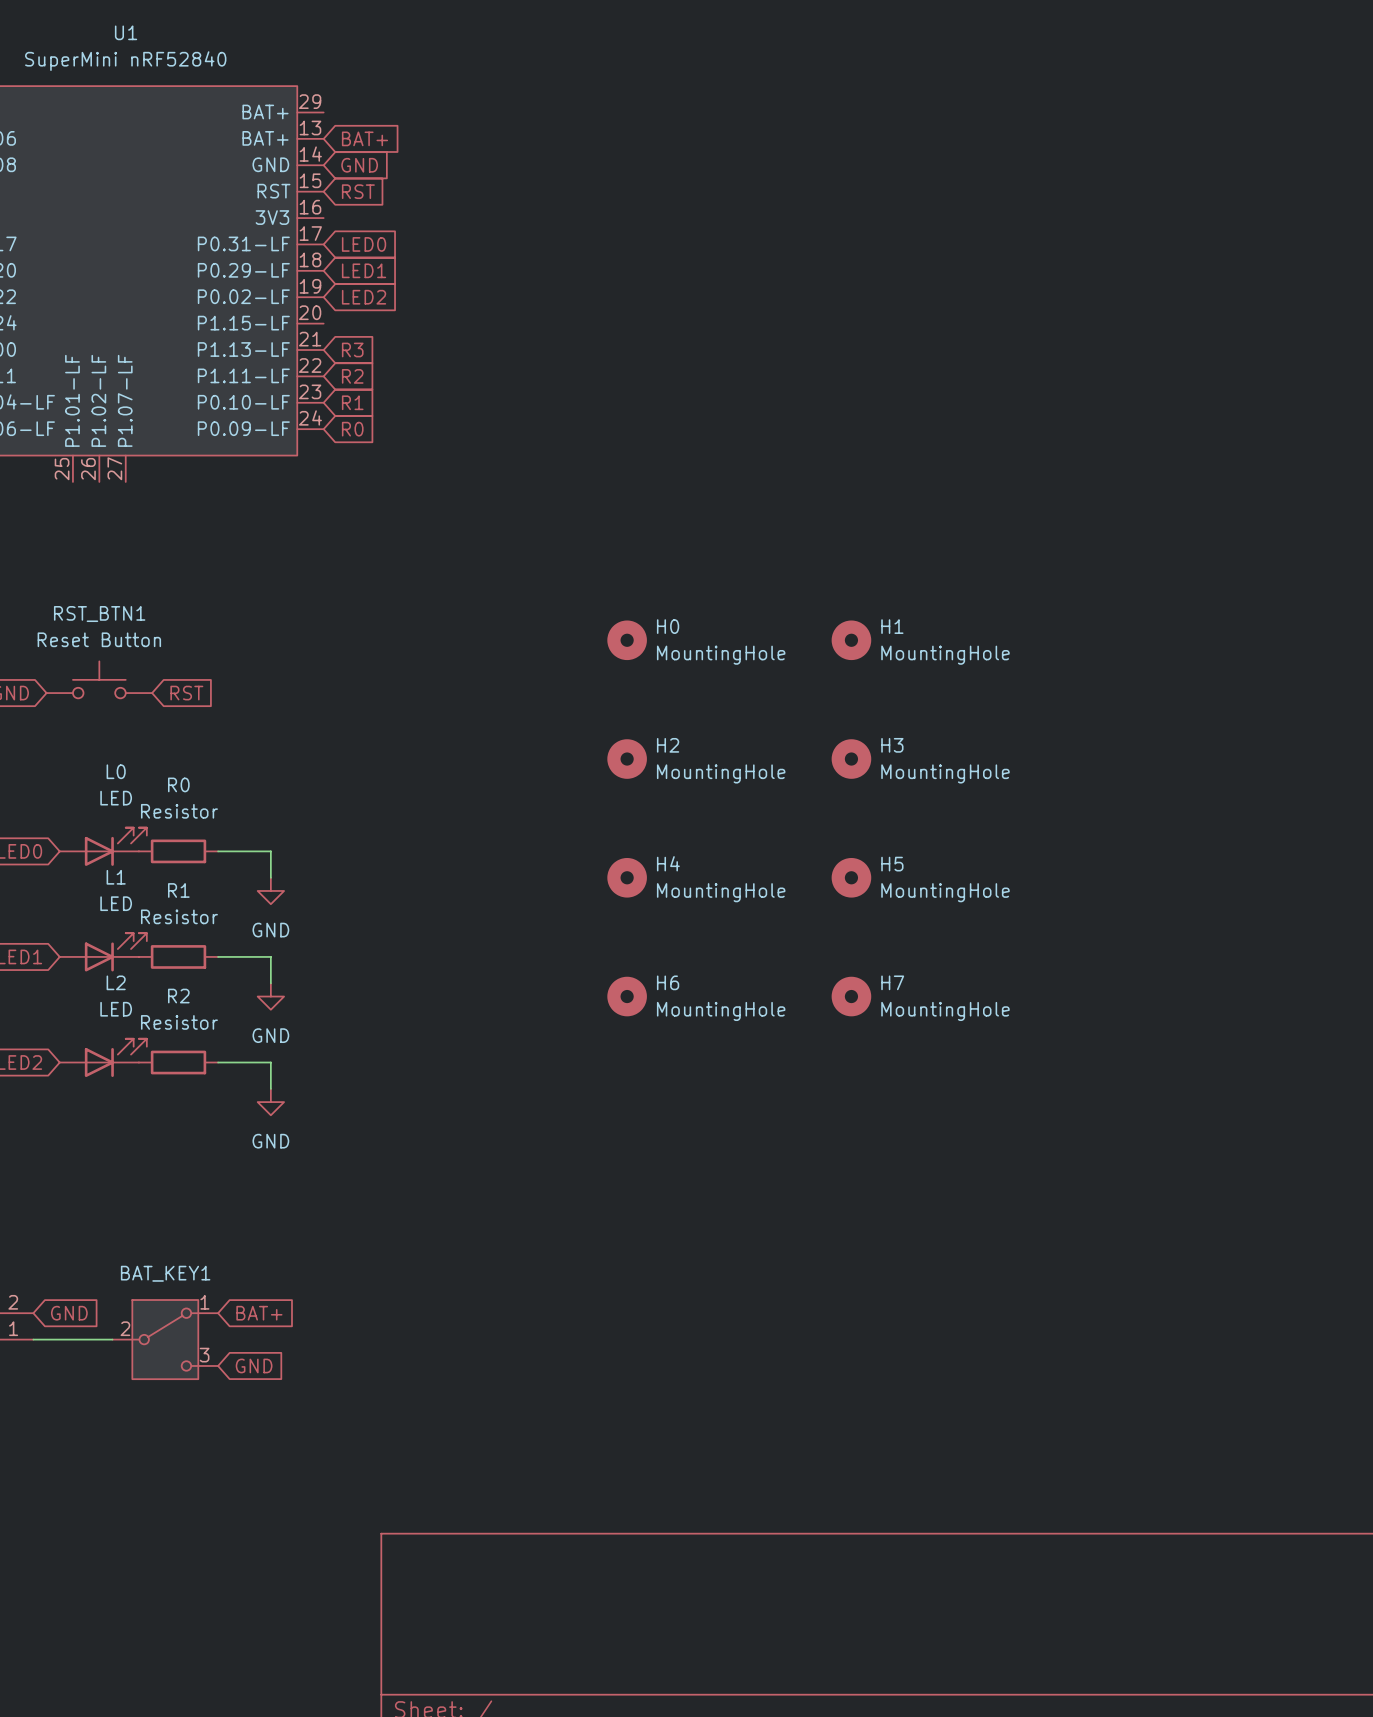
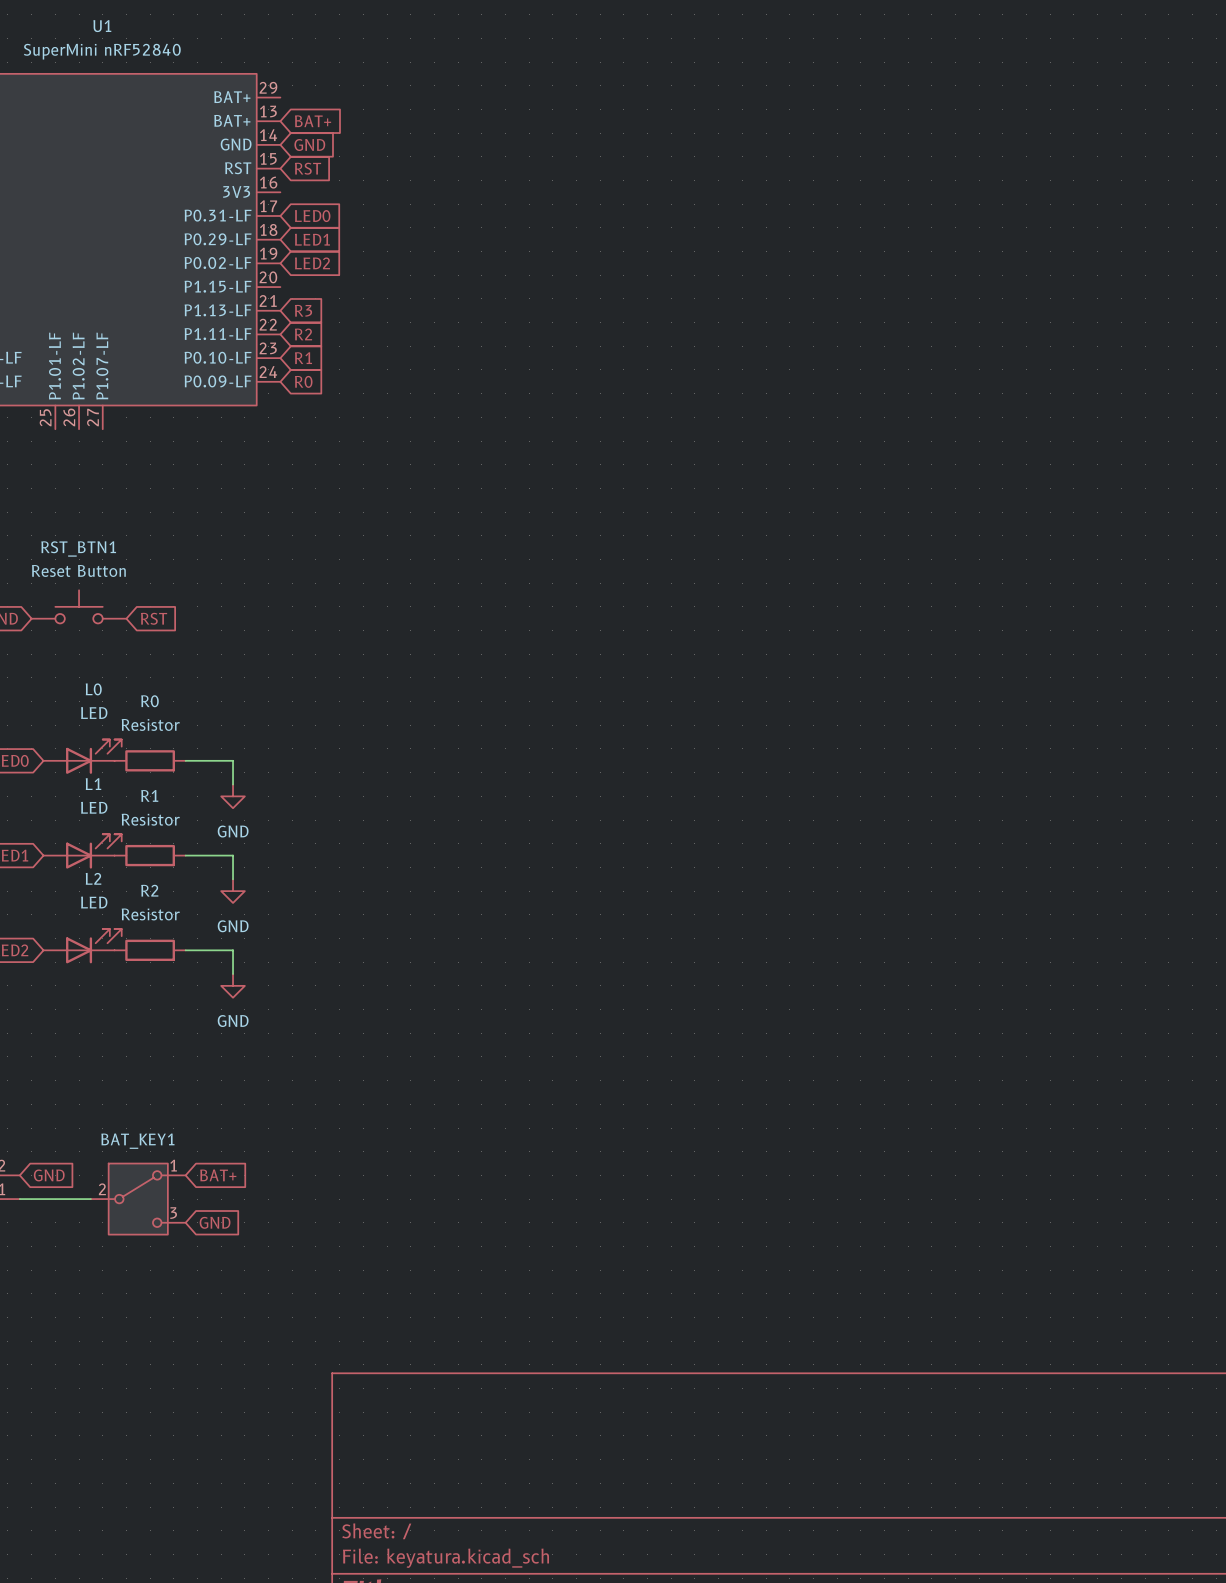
H0: MountingHole (627, 640) -> none
H1: MountingHole (851, 640) -> none
H2: MountingHole (627, 759) -> none
H3: MountingHole (851, 759) -> none
H4: MountingHole (627, 877) -> none
H5: MountingHole (851, 877) -> none
H6: MountingHole (627, 996) -> none
H7: MountingHole (851, 996) -> none

